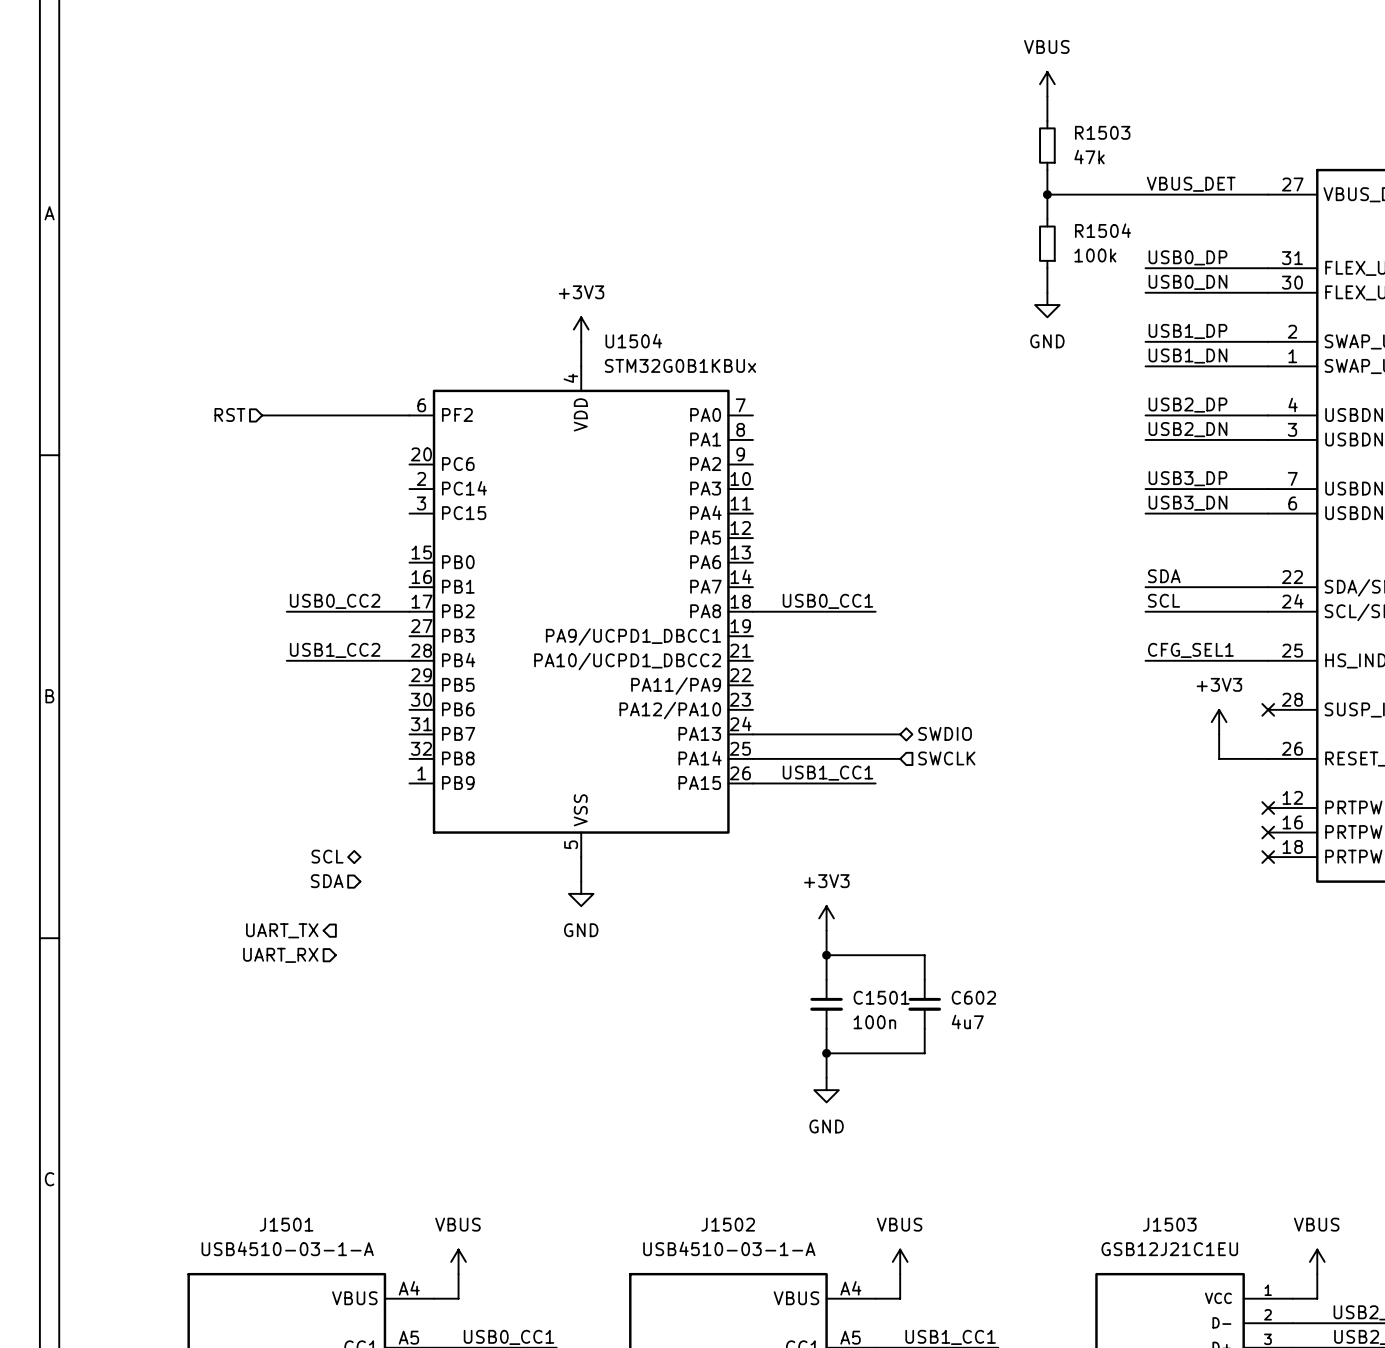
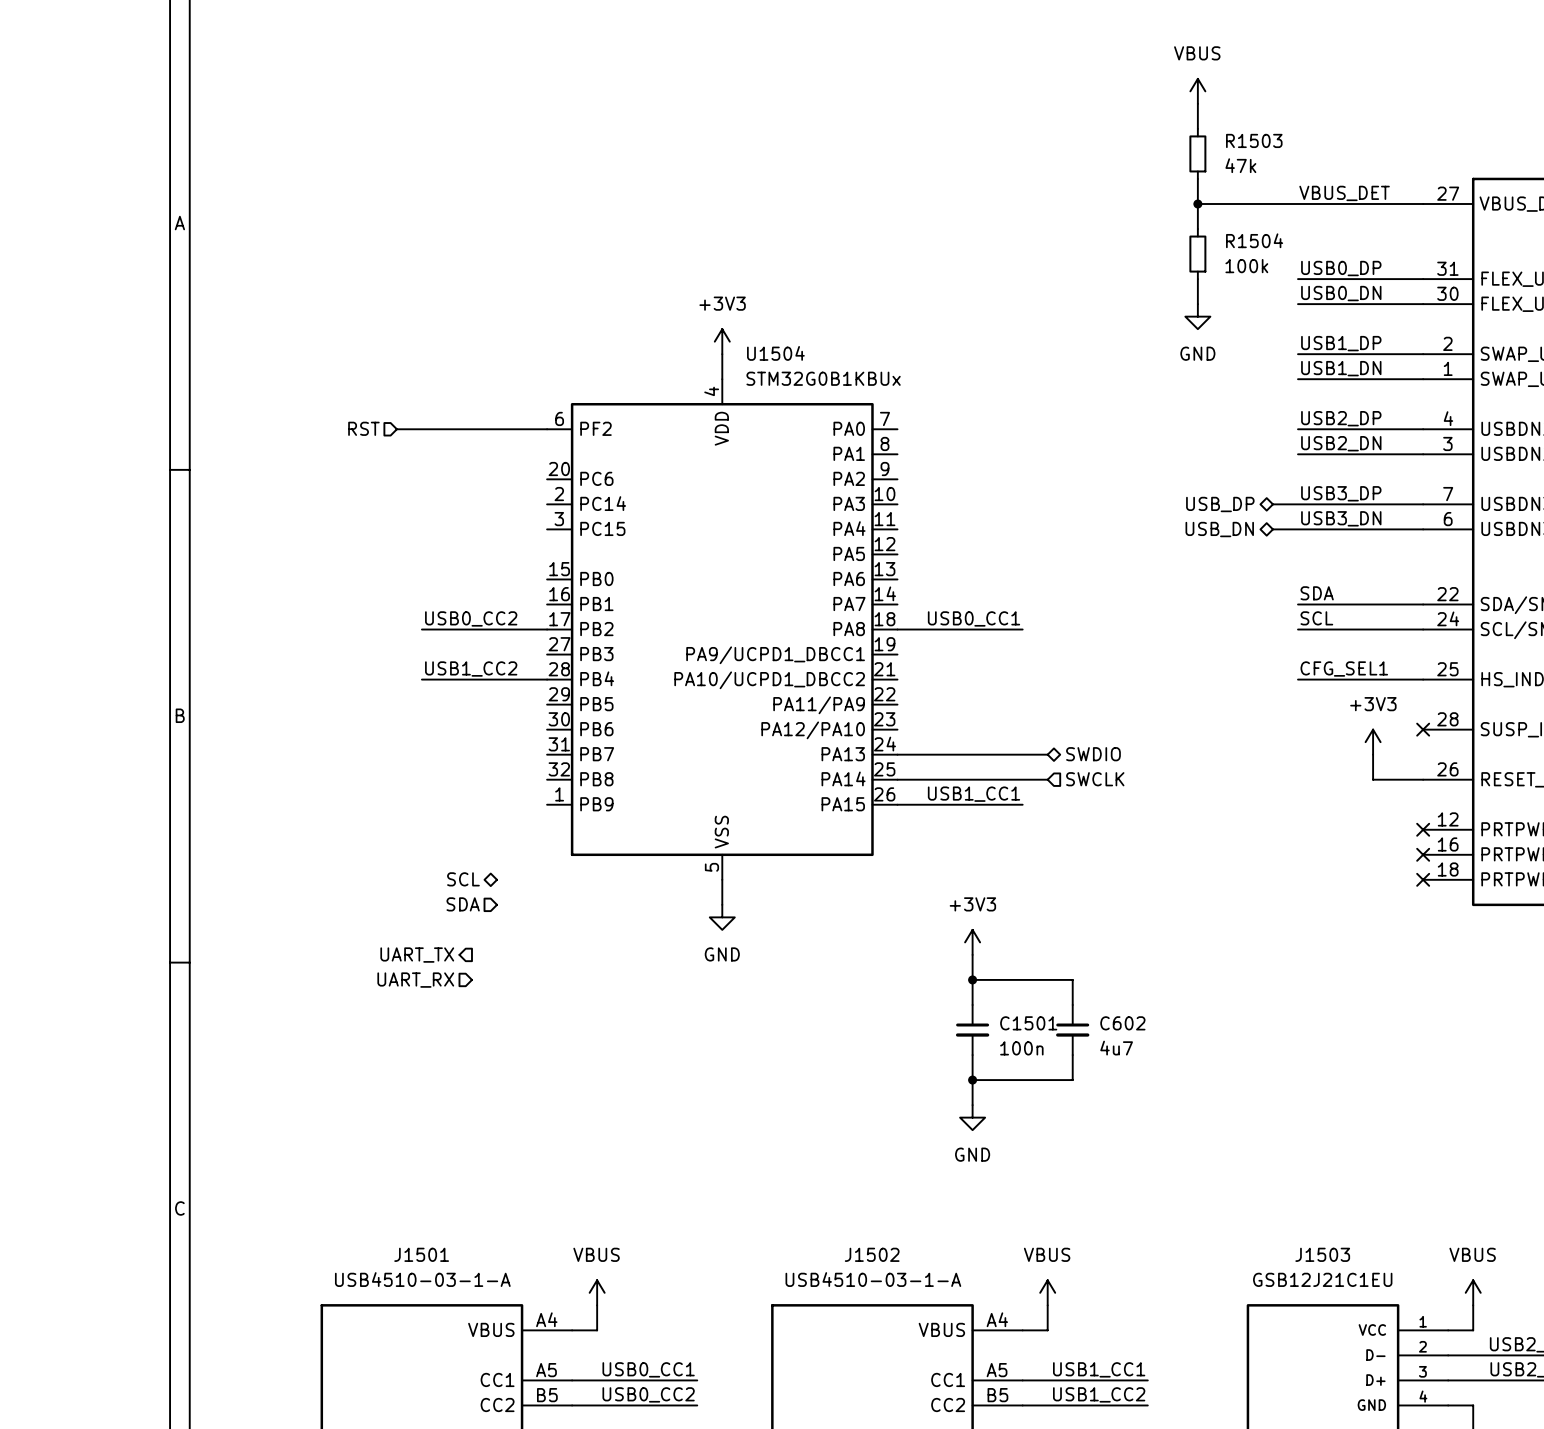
hierarchical label: none -> USB_DP (1220, 504)
wire: none -> (1272, 504) (1298, 504)
hierarchical label: none -> USB_DN (1219, 529)
wire: none -> (1272, 529) (1298, 529)

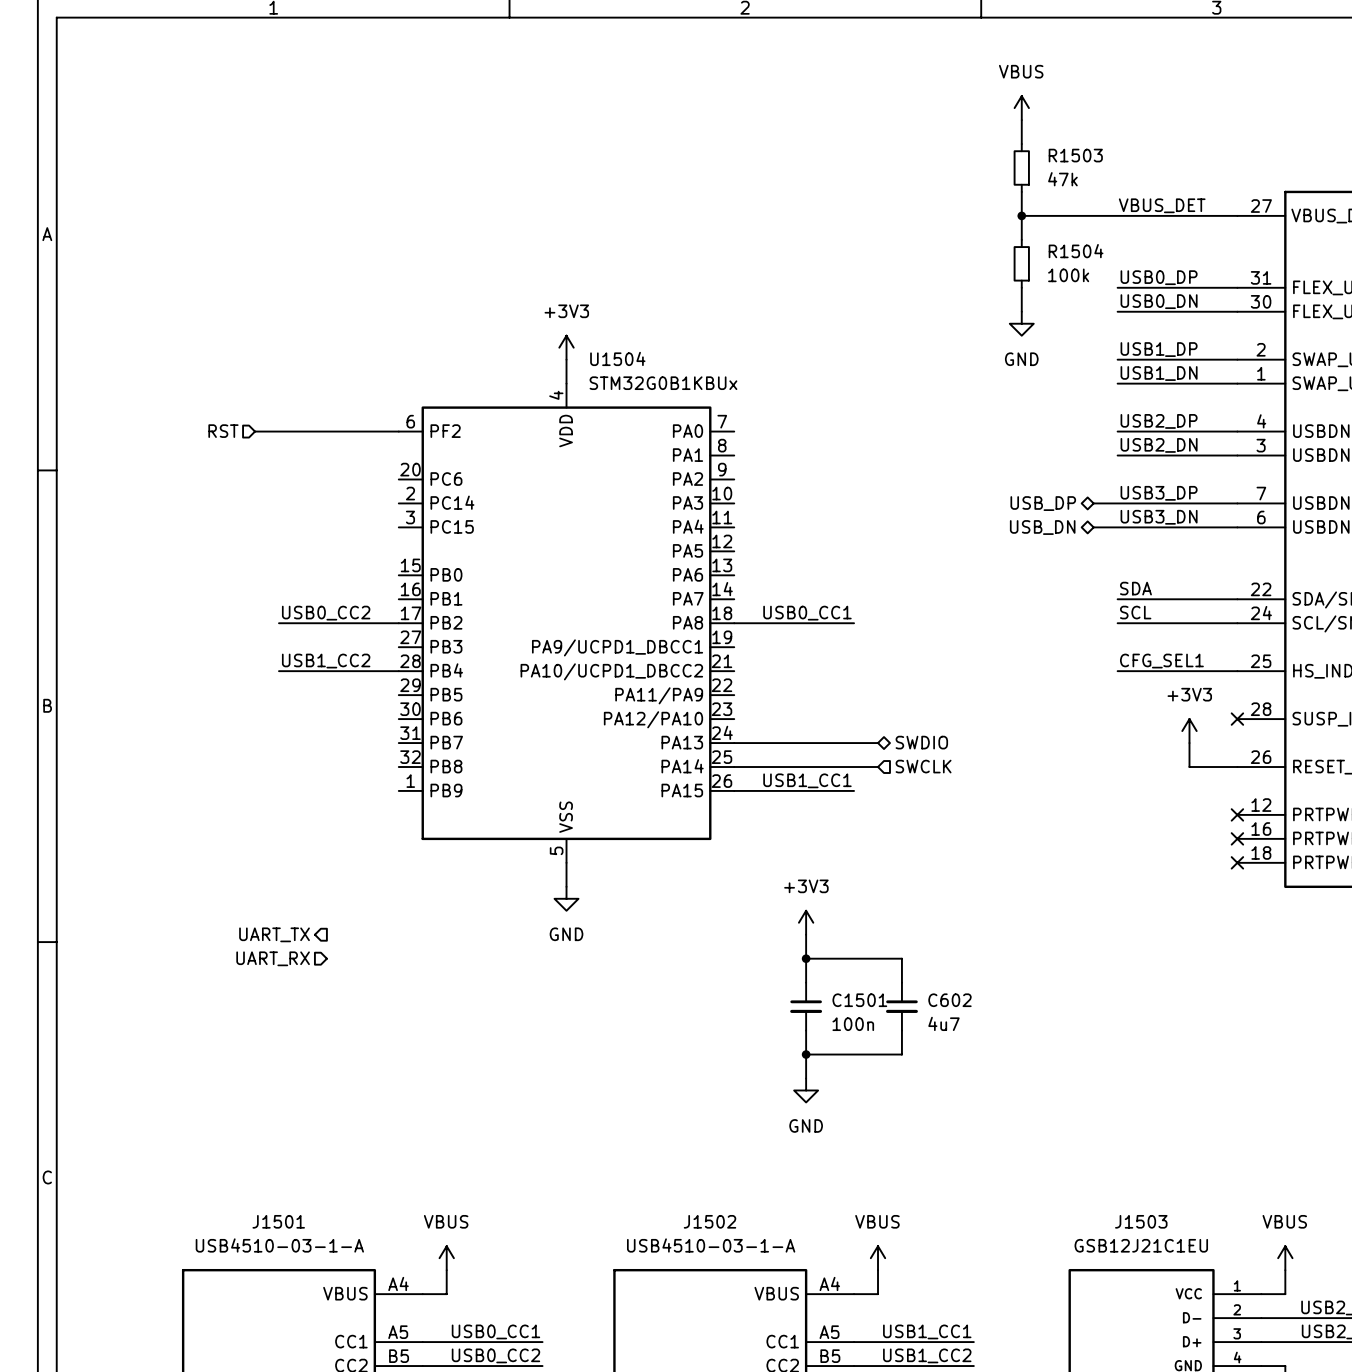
hierarchical label: SCL (463, 879) -> none
hierarchical label: SDA (463, 904) -> none

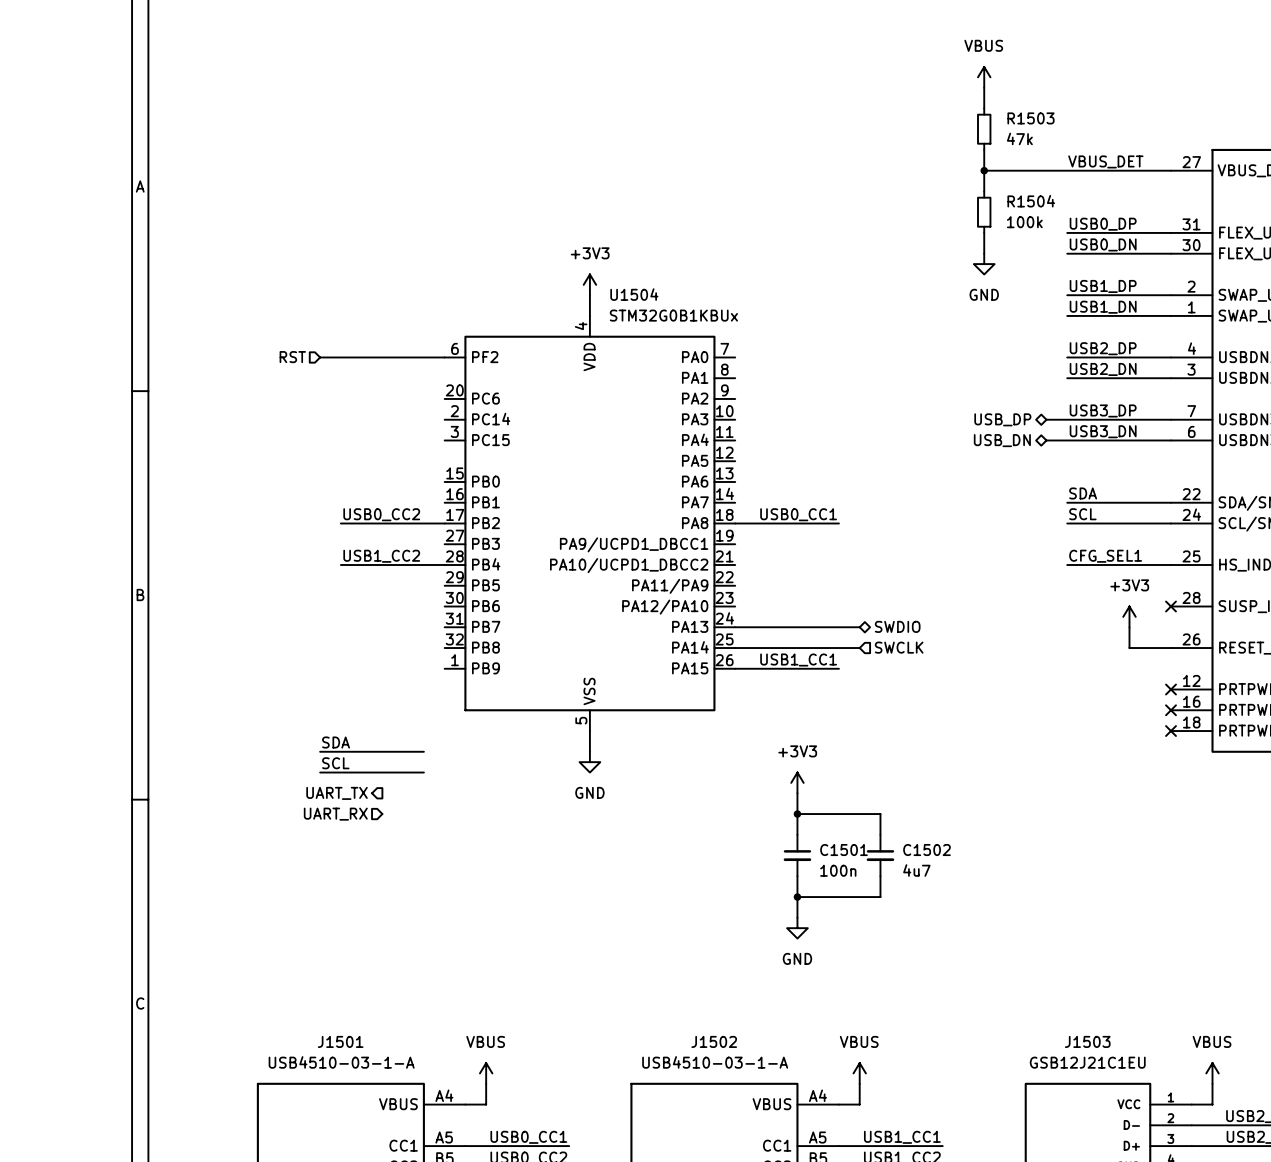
label: none -> SDA (336, 742)
wire: none -> (320, 751) (423, 751)
label: none -> SCL (335, 763)
wire: none -> (320, 772) (423, 772)
C602 name: C602 (949, 1000) -> C1502 (926, 850)

